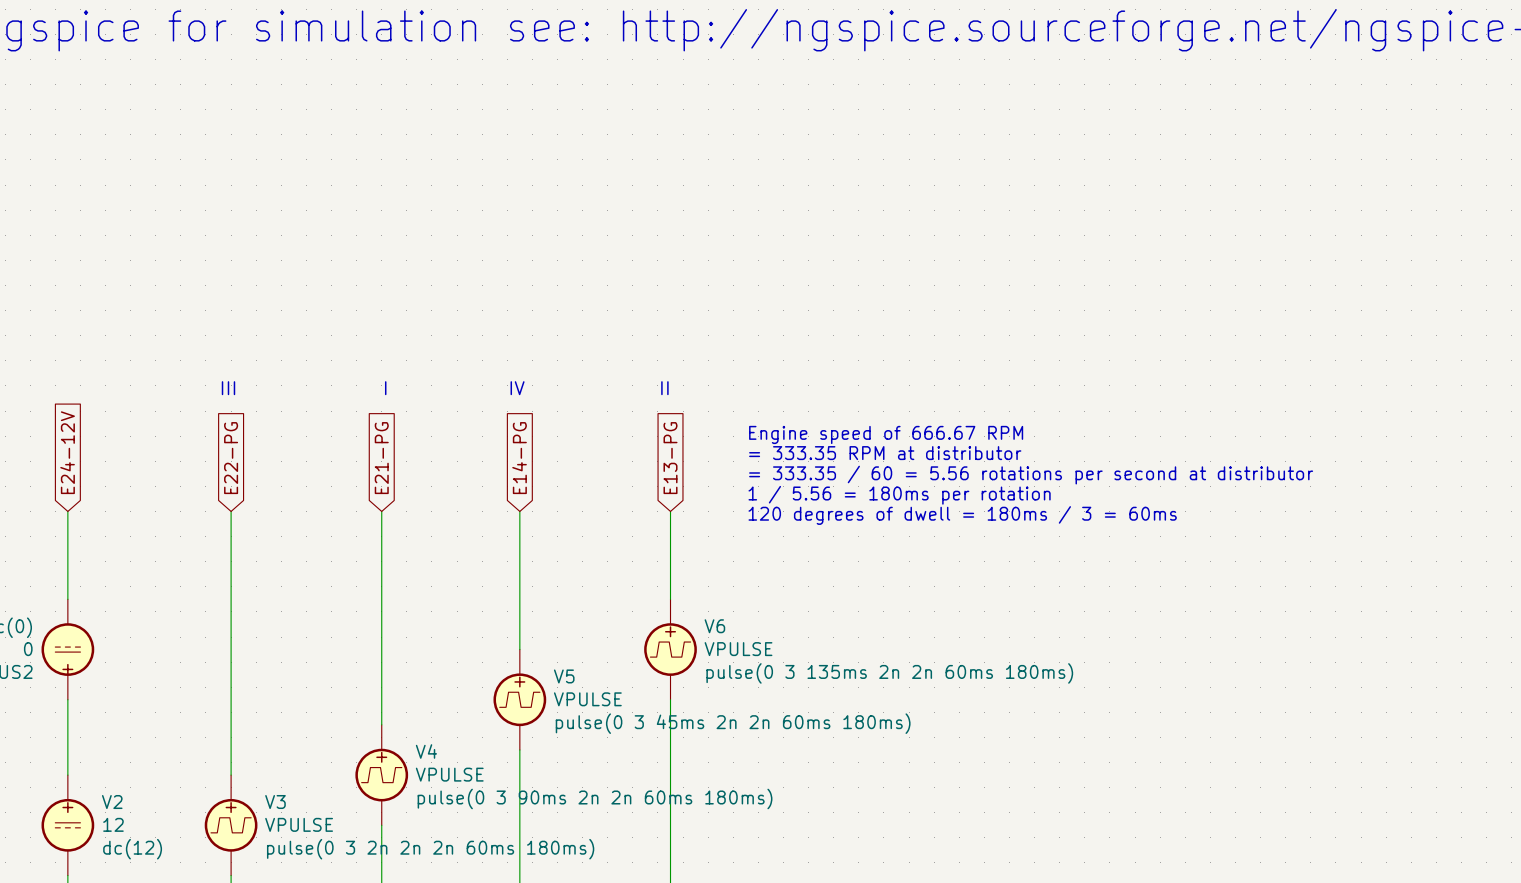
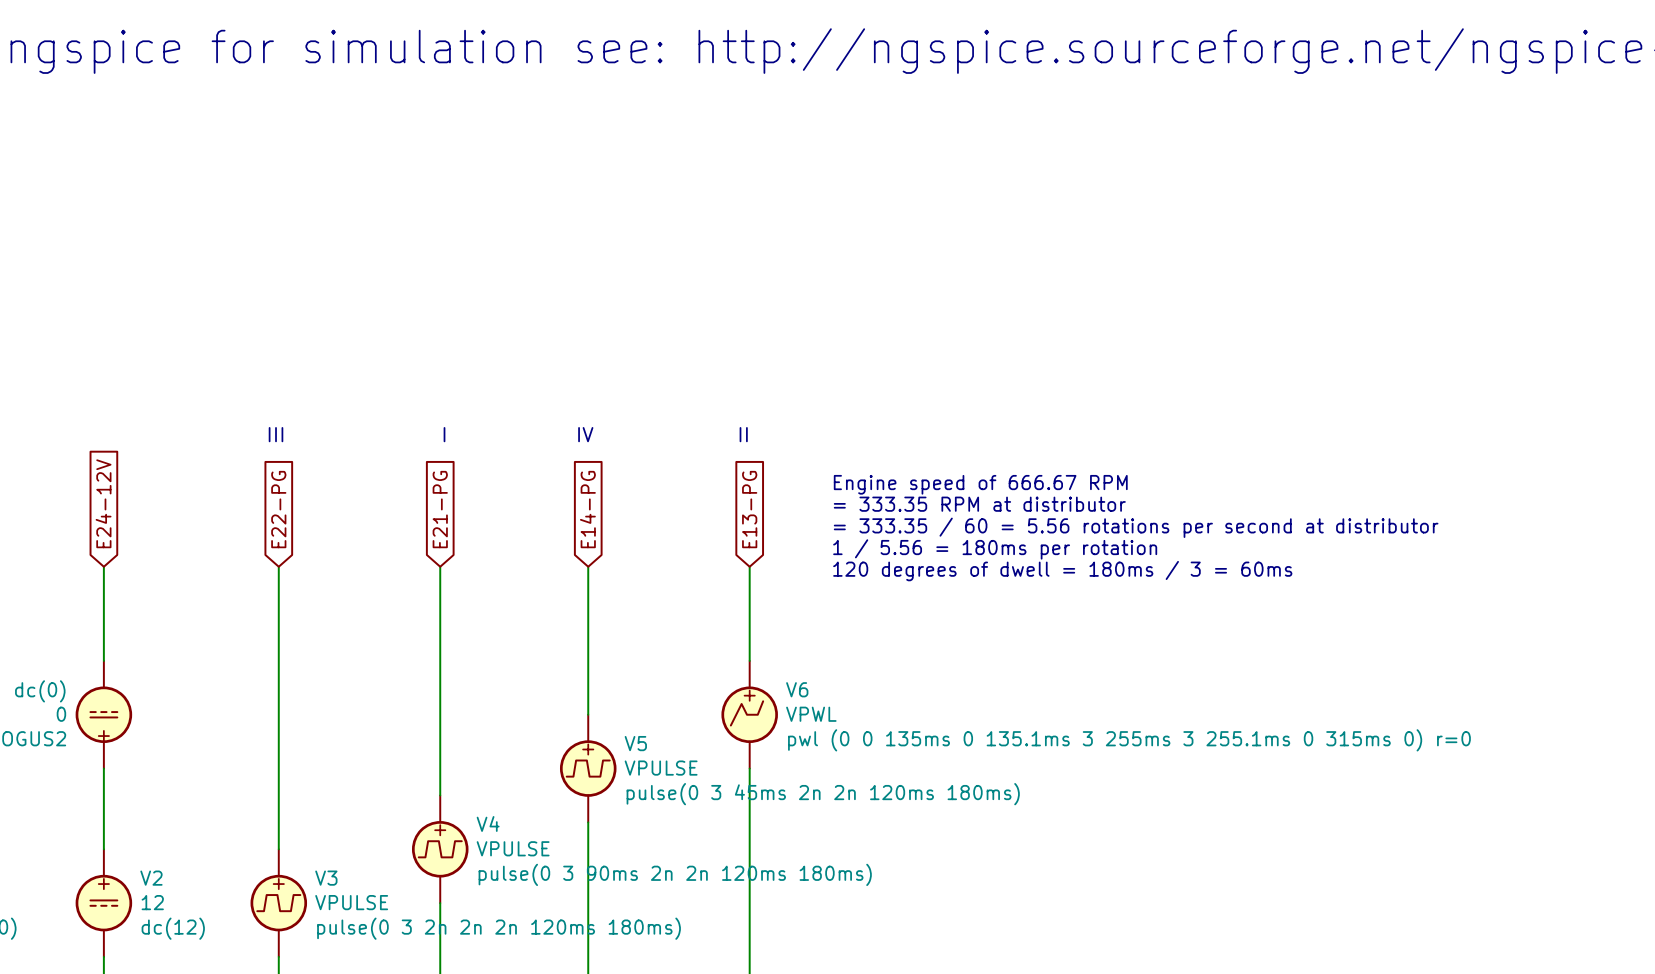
V6 symbol: [644, 599, 697, 700] -> [721, 660, 778, 769]
V6 value: VPULSE (738, 649) -> VPWL (811, 714)
V6 text: pulse(0 3 135ms 2n 2n 60ms 180ms) (889, 673) -> pwl (0 0 135ms 0 135.1ms 3 255ms 3 255.1ms 0 315ms 0) r=0 (1129, 740)
V5 text: pulse(0 3 45ms 2n 2n 60ms 180ms) (733, 723) -> pulse(0 3 45ms 2n 2n 120ms 180ms) (823, 794)
V4 text: pulse(0 3 90ms 2n 2n 60ms 180ms) (595, 798) -> pulse(0 3 90ms 2n 2n 120ms 180ms) (675, 874)
V3 text: pulse(0 3 2n 2n 2n 60ms 180ms) (430, 849) -> pulse(0 3 2n 2n 2n 120ms 180ms) (499, 928)

